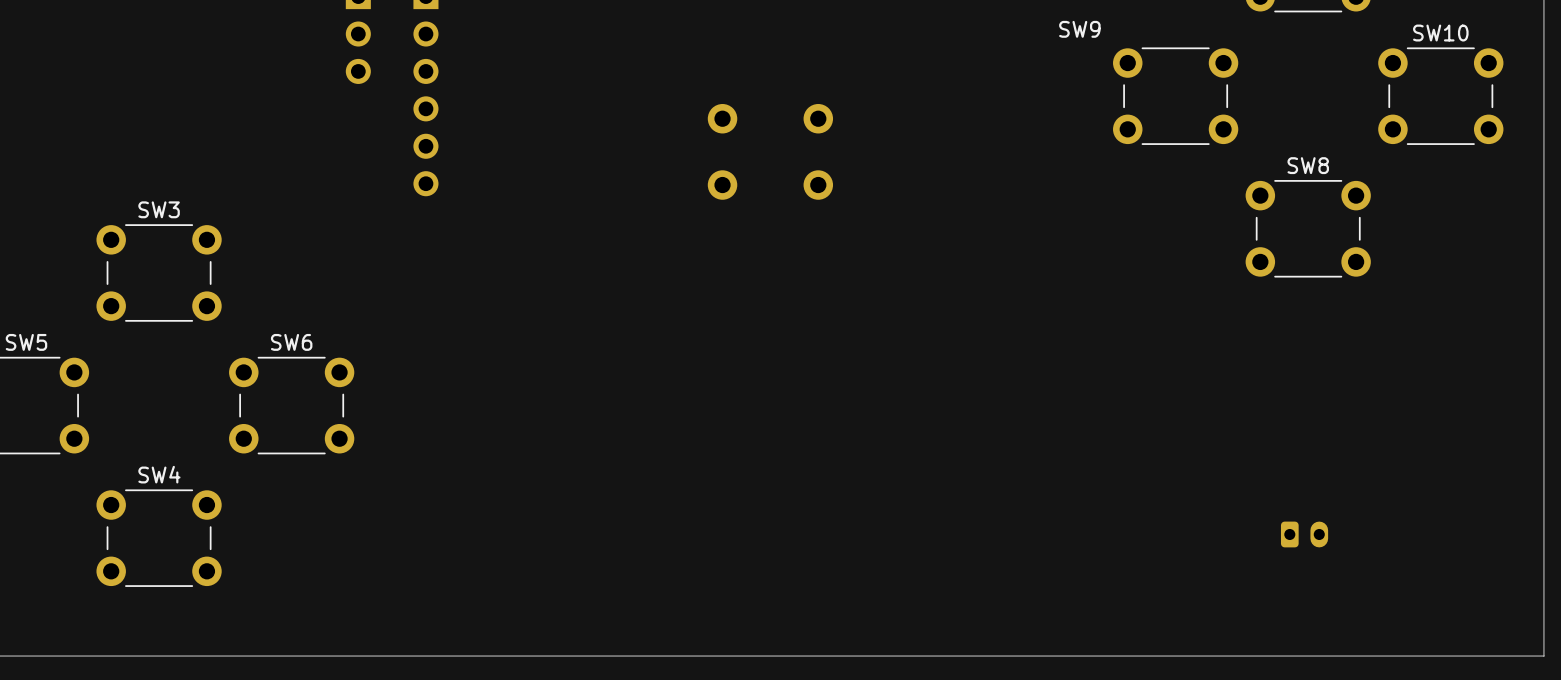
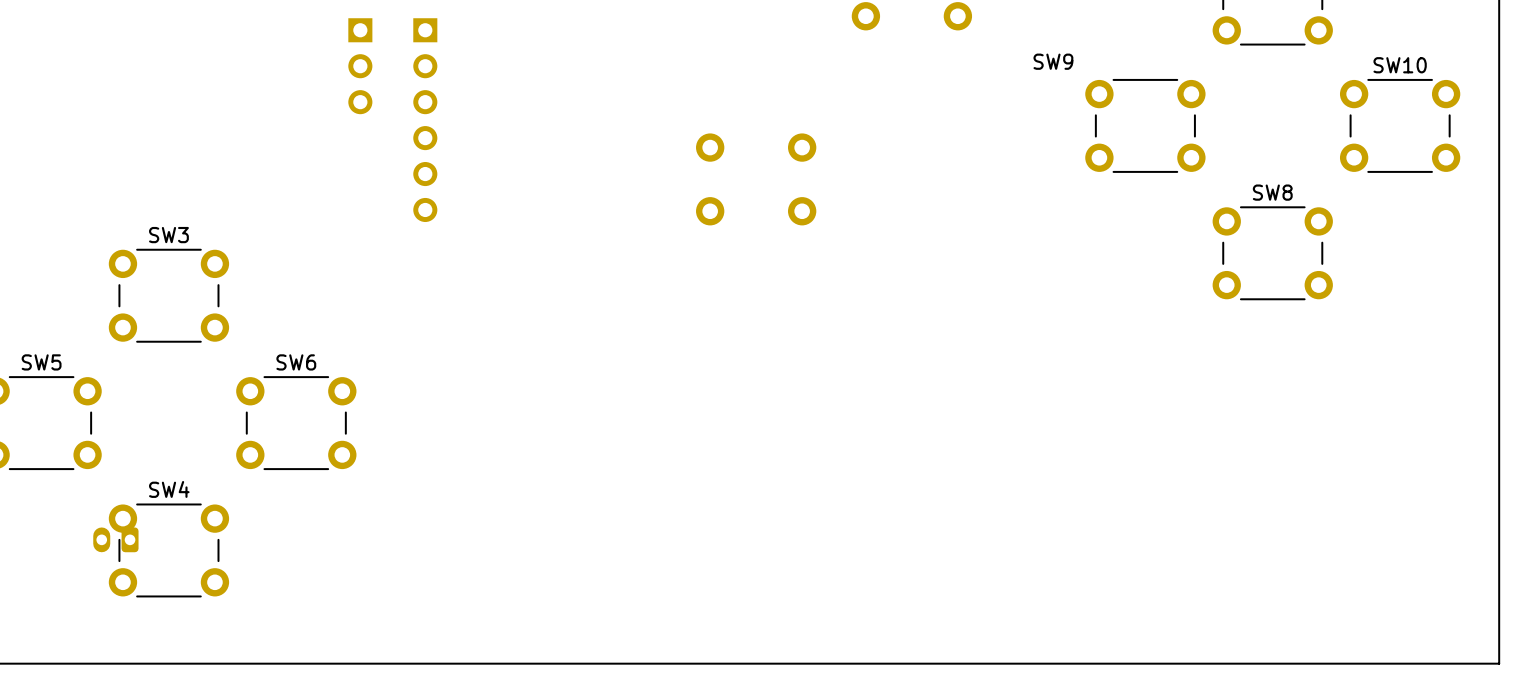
part: none -> (115, 539)
part: (1304, 534) -> none

